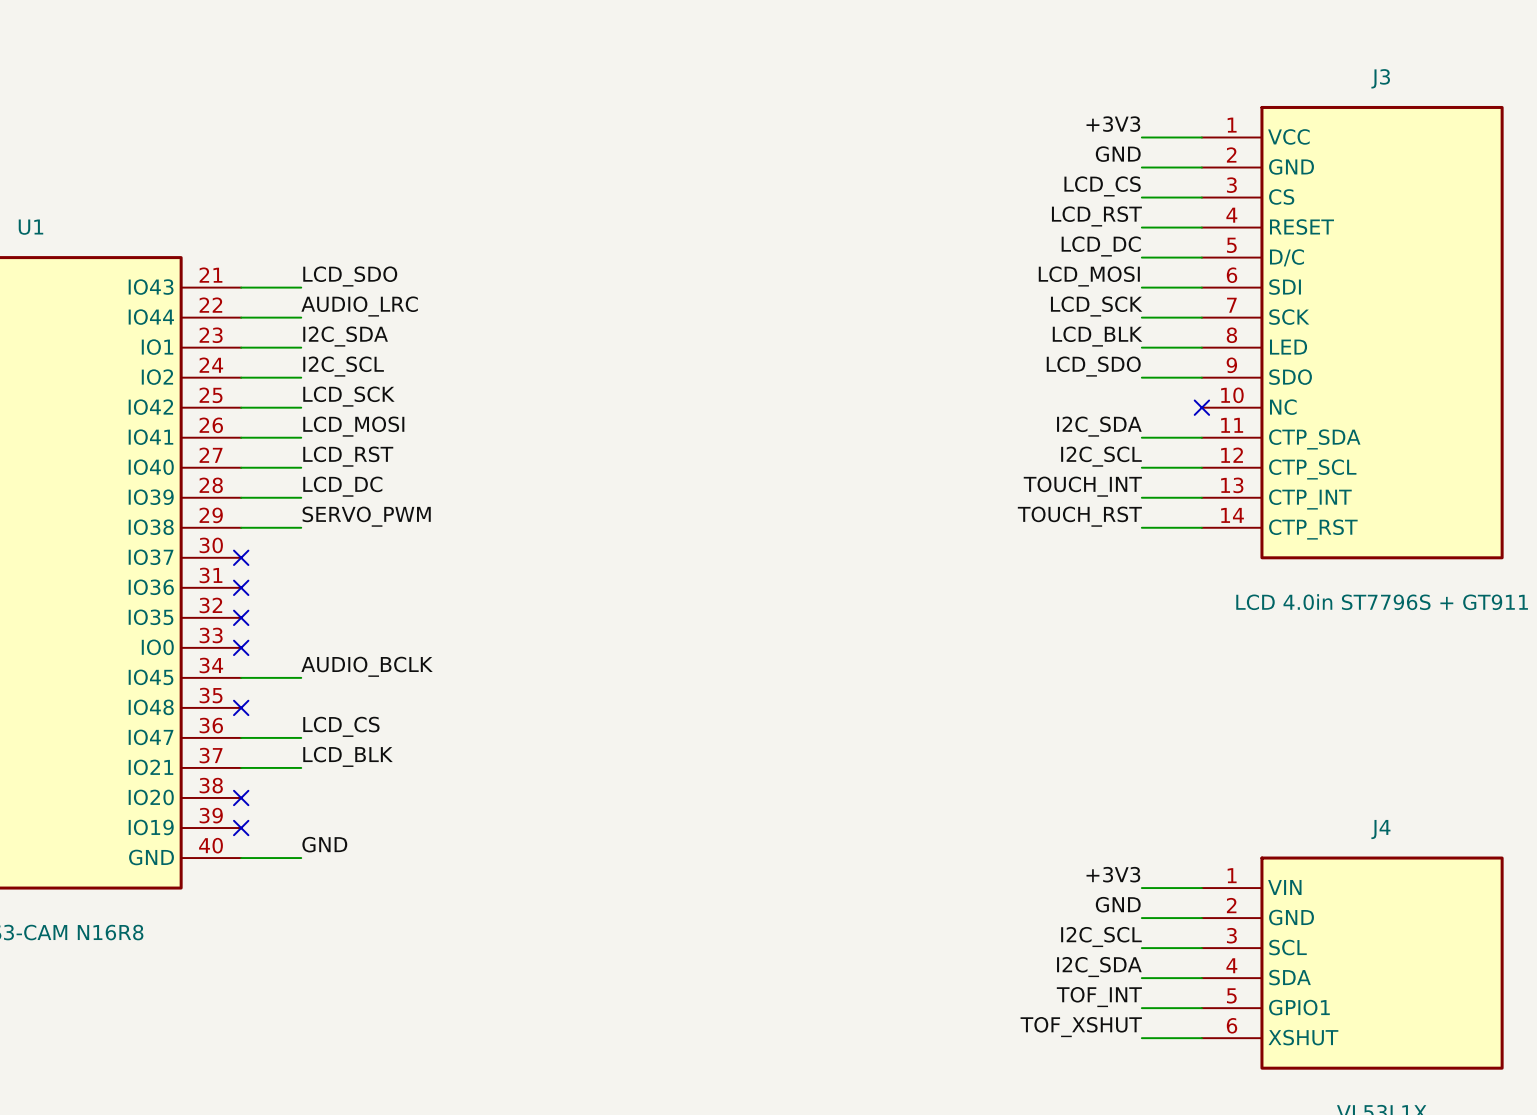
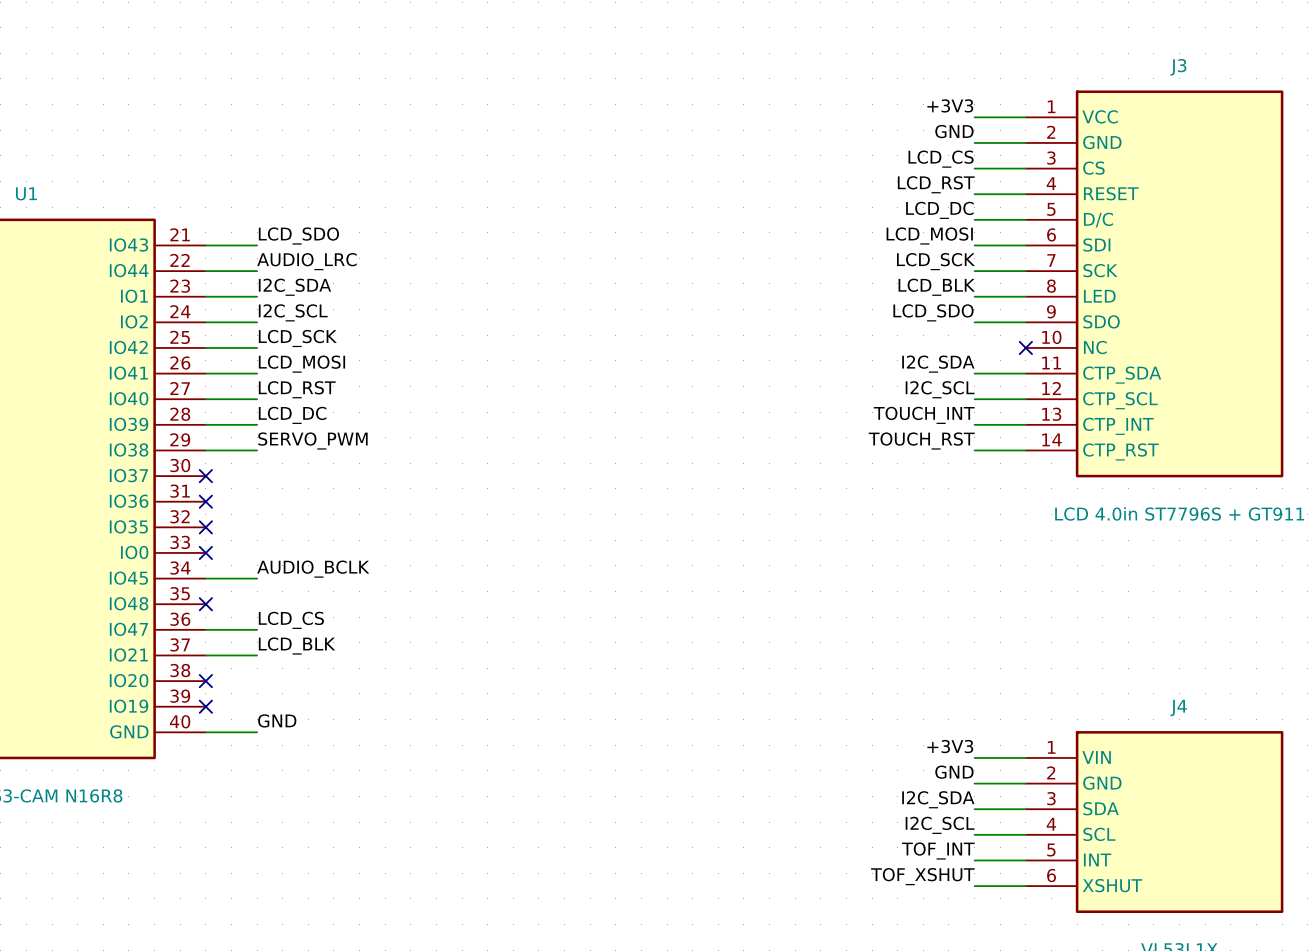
label: I2C_SCL (1101, 936) -> I2C_SDA (938, 799)
J4 pin name: SCL (1288, 947) -> SDA (1101, 808)
label: I2C_SDA (1099, 967) -> I2C_SCL (940, 825)
J4 pin name: SDA (1290, 977) -> SCL (1099, 834)
J4 pin name: GPIO1 (1299, 1007) -> INT (1097, 859)

